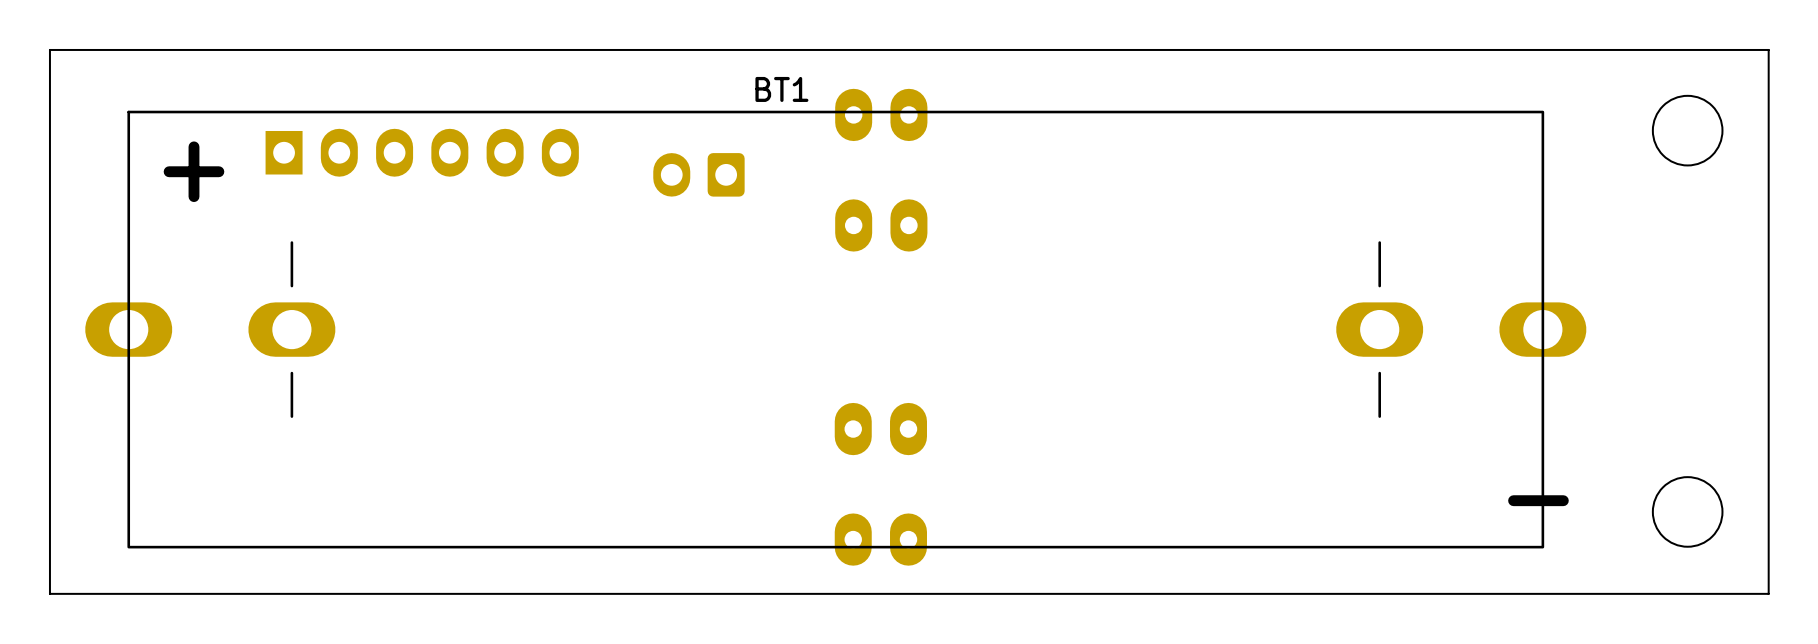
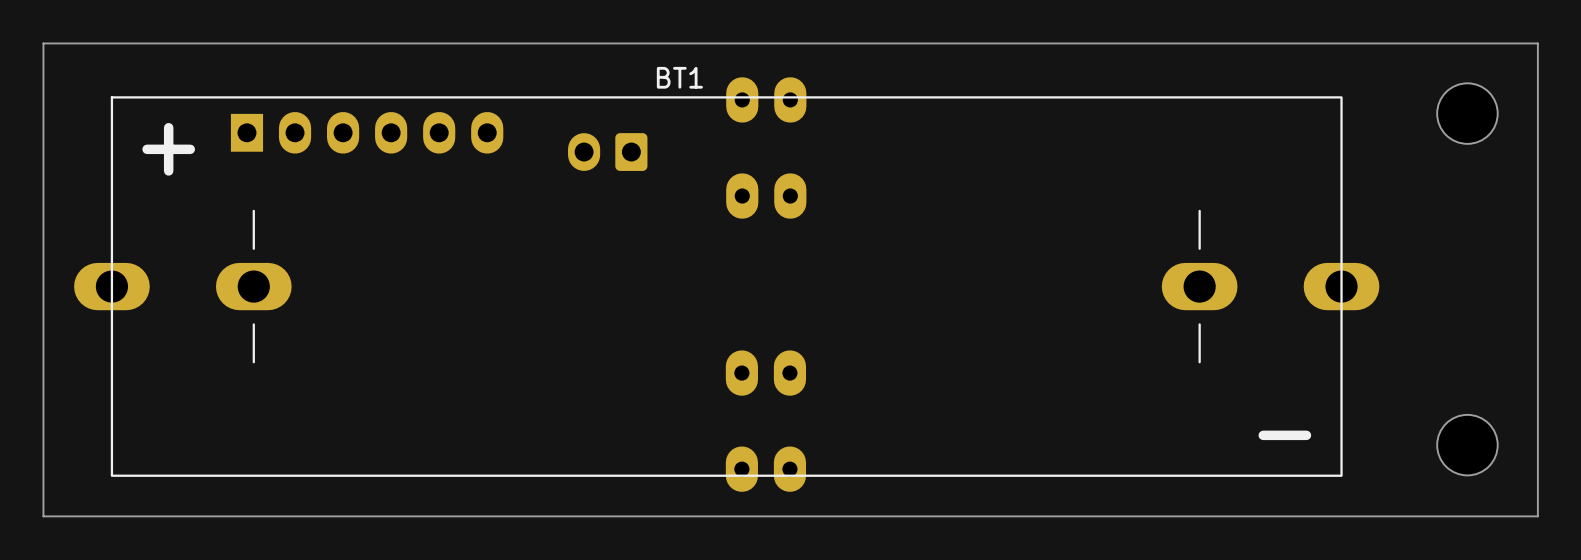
BT1 footprint: [85, 110, 1587, 549] -> [74, 96, 1380, 477]

